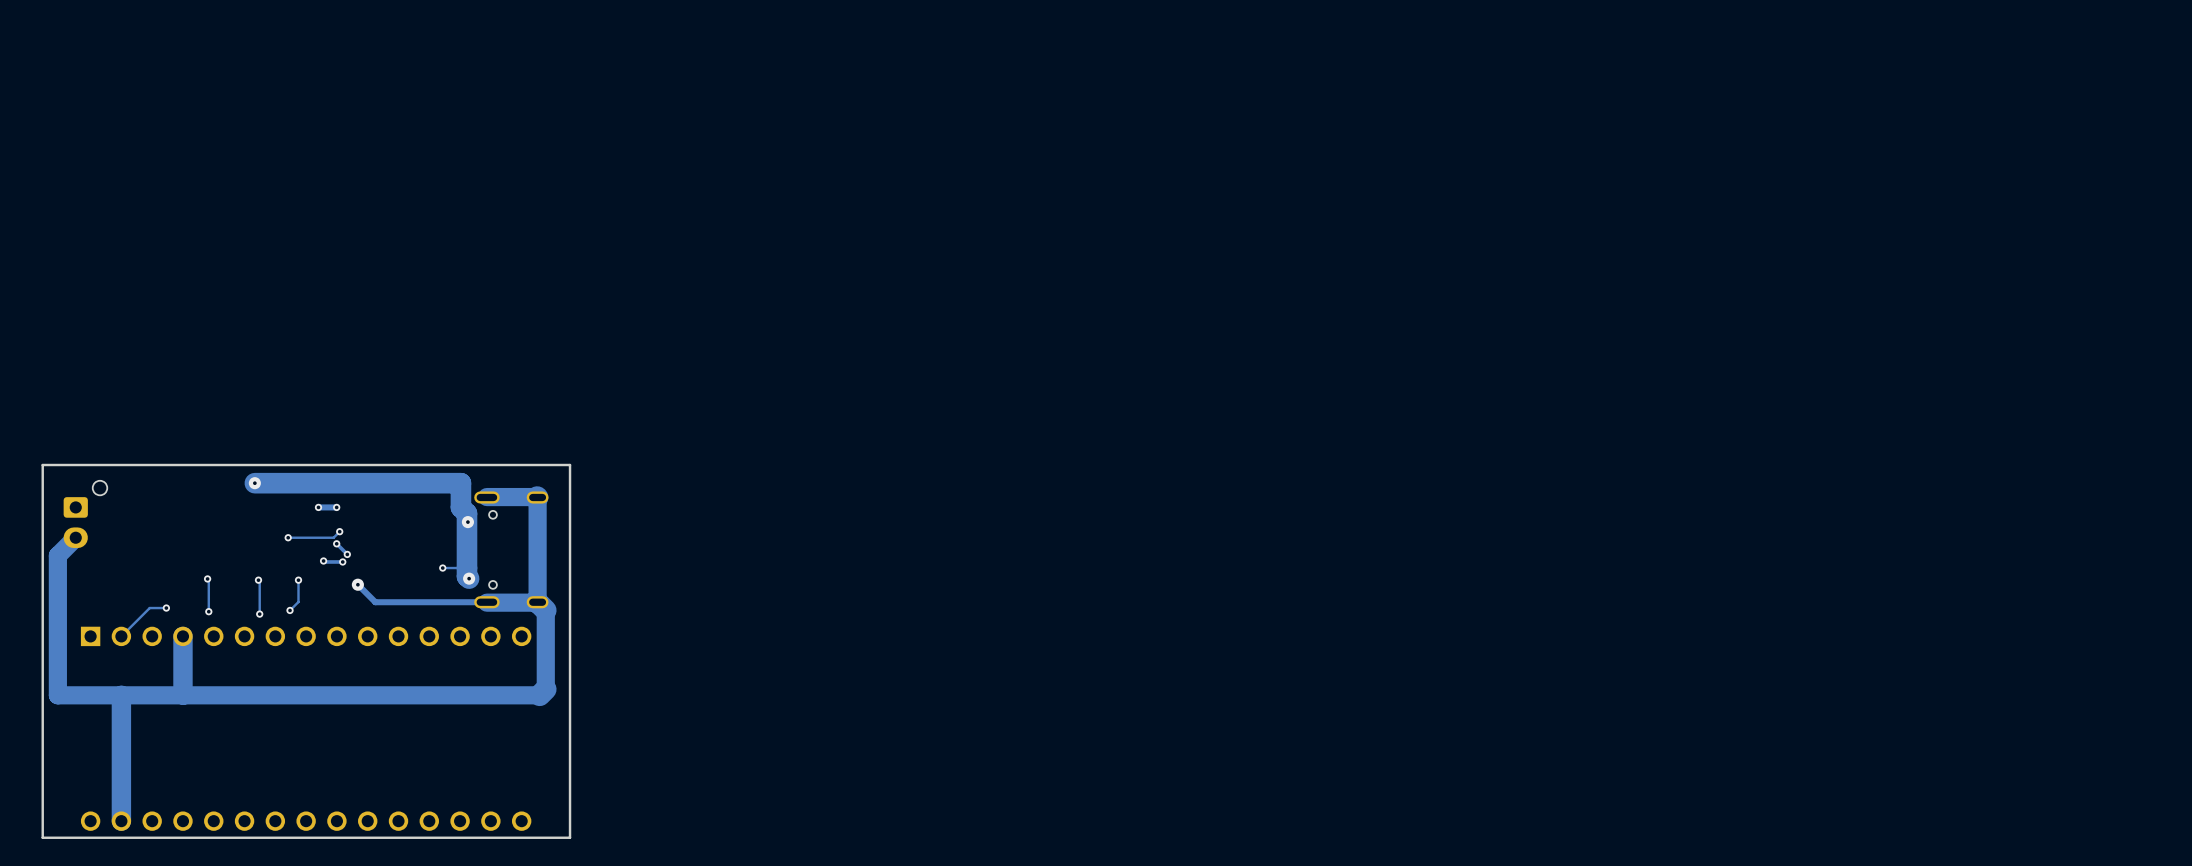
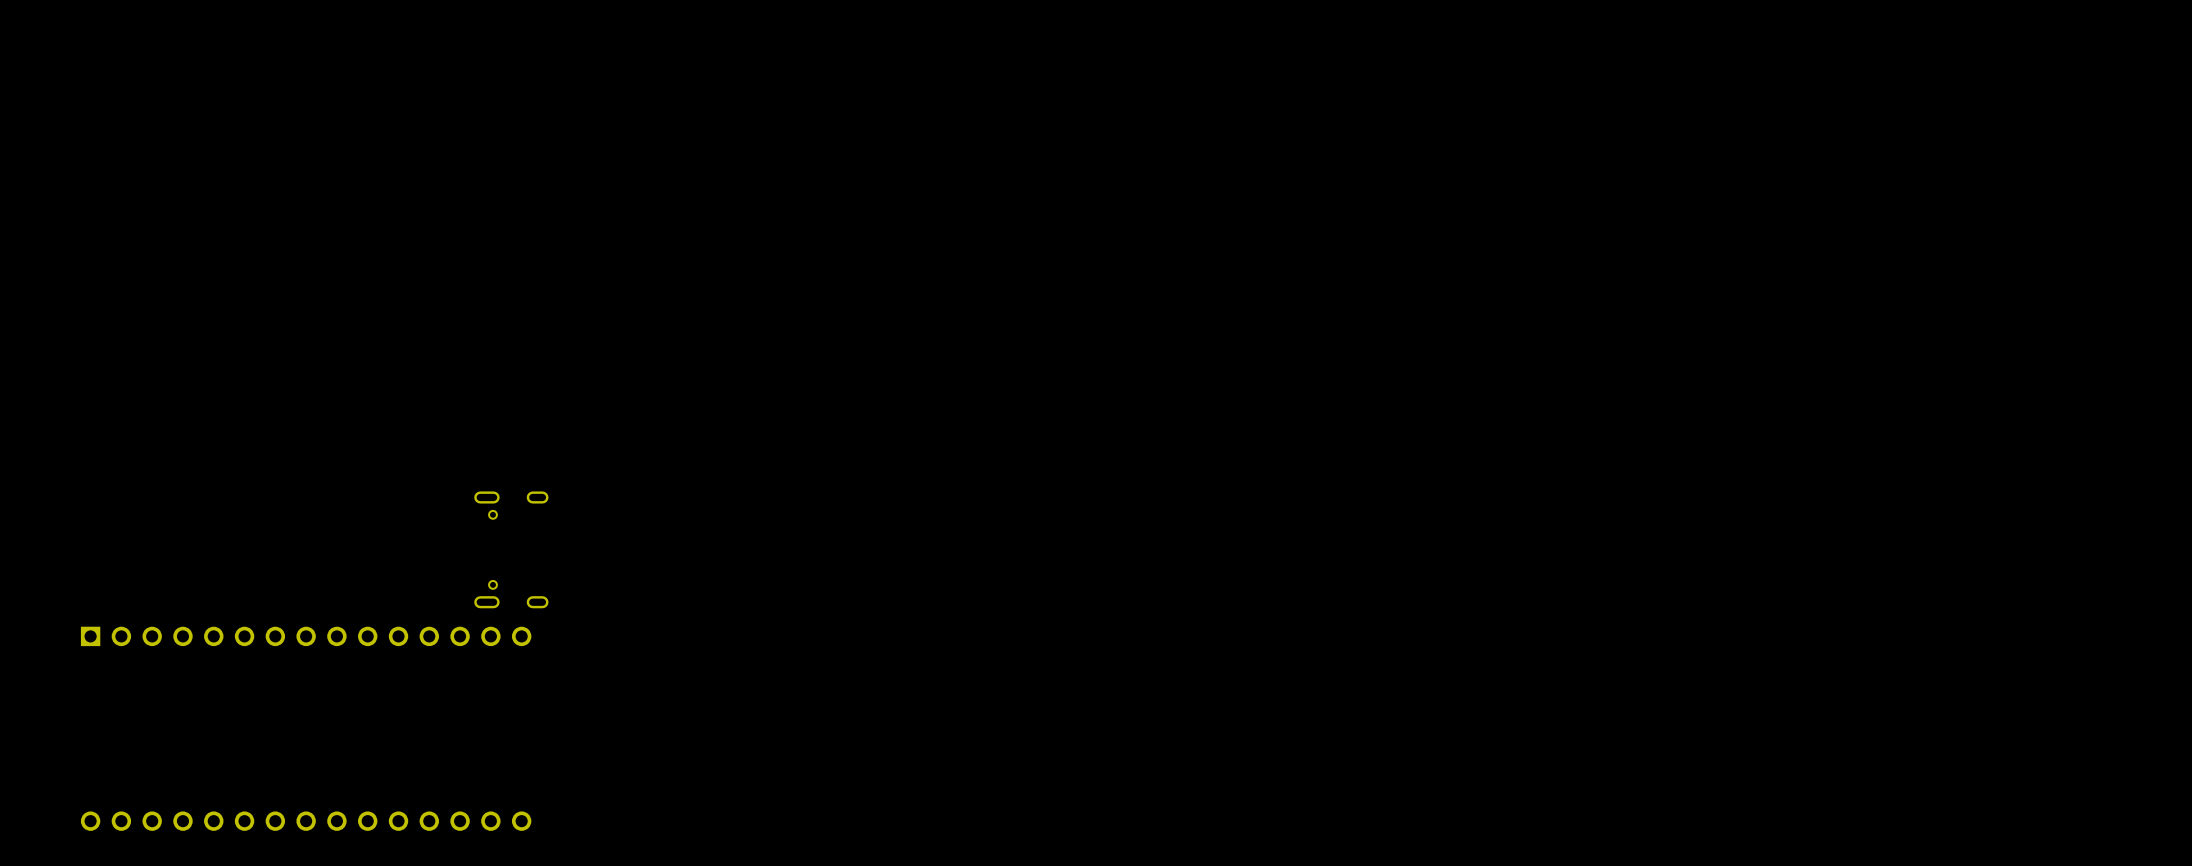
board edge: (570, 465) (42, 465) (42, 837) (570, 837) (570, 465) -> none
track: (254, 483) (460, 483) (460, 507) (466, 513) (466, 576) (469, 578) -> none
via: (254, 483) -> none
track: (486, 497) (537, 497) (537, 602) -> none
via: (318, 507) -> none
track: (336, 507) (318, 507) -> none
via: (336, 507) -> none
part: (85, 514) -> none
via: (467, 522) -> none
track: (339, 531) (333, 537) (288, 537) -> none
via: (339, 531) -> none
track: (75, 537) (57, 555) (57, 695) (539, 695) (545, 689) (545, 610) (537, 602) -> none
via: (288, 537) -> none
track: (336, 543) (347, 554) -> none
via: (336, 543) -> none
via: (347, 554) -> none
track: (323, 560) (342, 561) -> none
via: (323, 560) -> none
via: (342, 561) -> none
via: (442, 568) -> none
track: (466, 568) (442, 568) -> none
track: (207, 578) (208, 611) -> none
via: (207, 578) -> none
via: (469, 578) -> none
track: (258, 580) (259, 614) -> none
via: (258, 580) -> none
track: (298, 580) (298, 601) (290, 610) -> none
via: (298, 580) -> none
track: (357, 584) (375, 602) (486, 602) -> none
via: (357, 584) -> none
track: (537, 602) (486, 602) -> none
track: (166, 608) (149, 608) (121, 636) -> none
via: (166, 608) -> none
via: (290, 610) -> none
via: (208, 611) -> none
via: (259, 614) -> none
track: (182, 636) (183, 695) -> none
track: (121, 695) (121, 821) -> none

